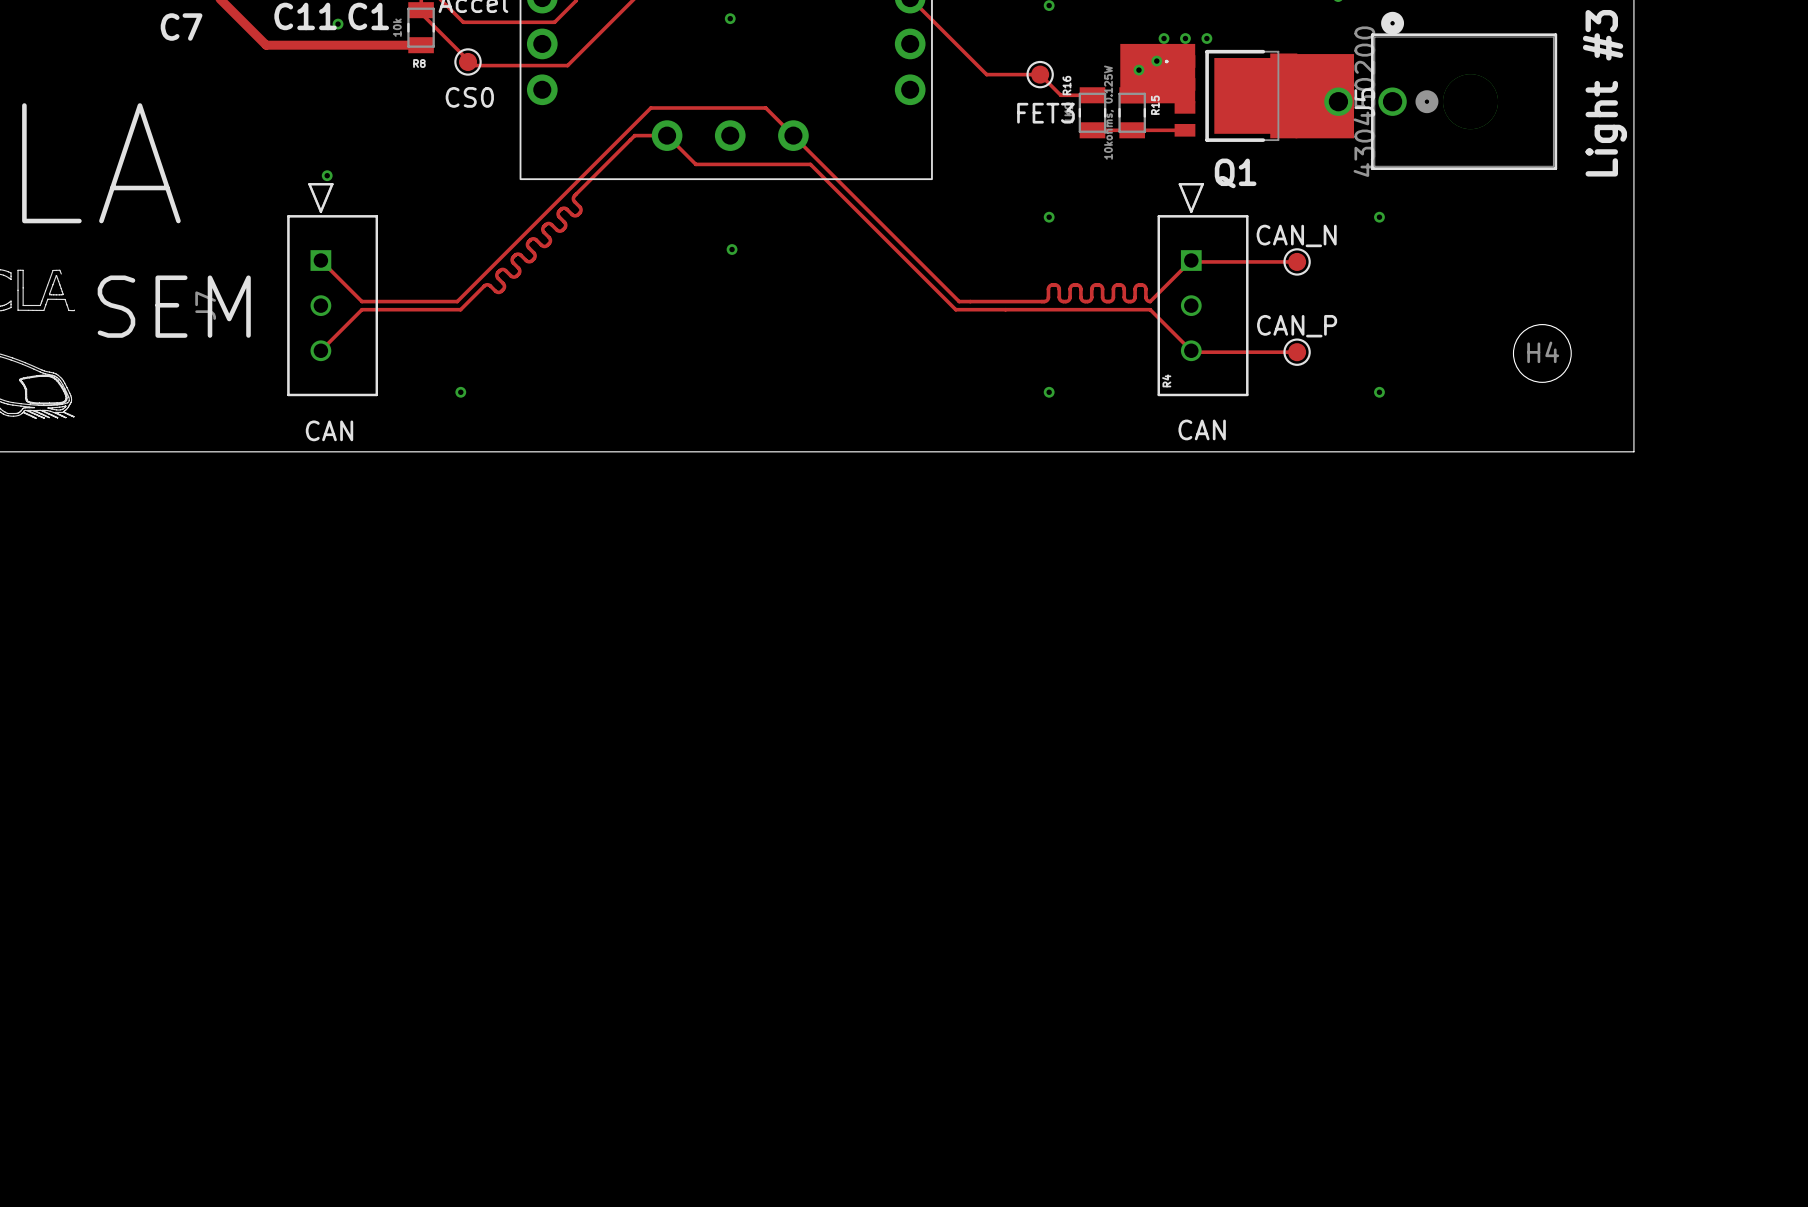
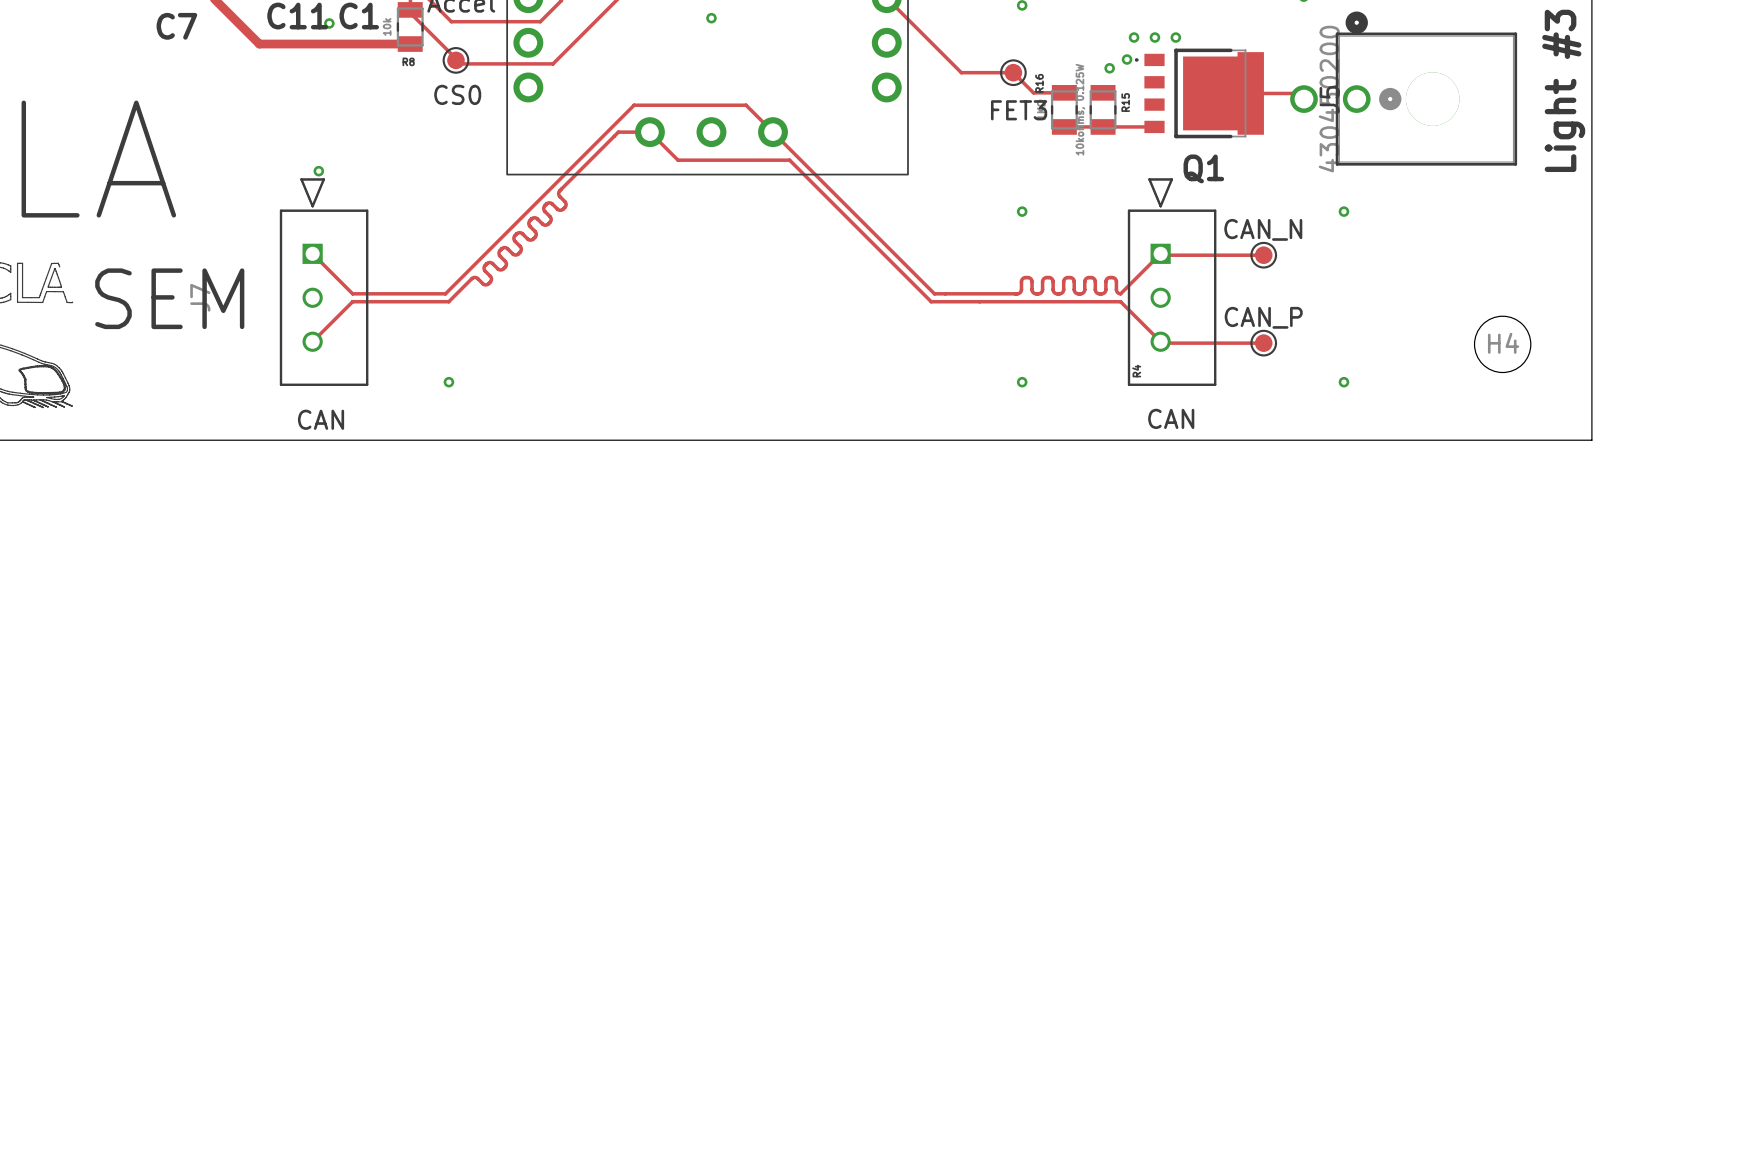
drawing: [1120, 43, 1196, 104] -> none
drawing: [1295, 54, 1355, 139] -> none
via: (732, 249) -> none

